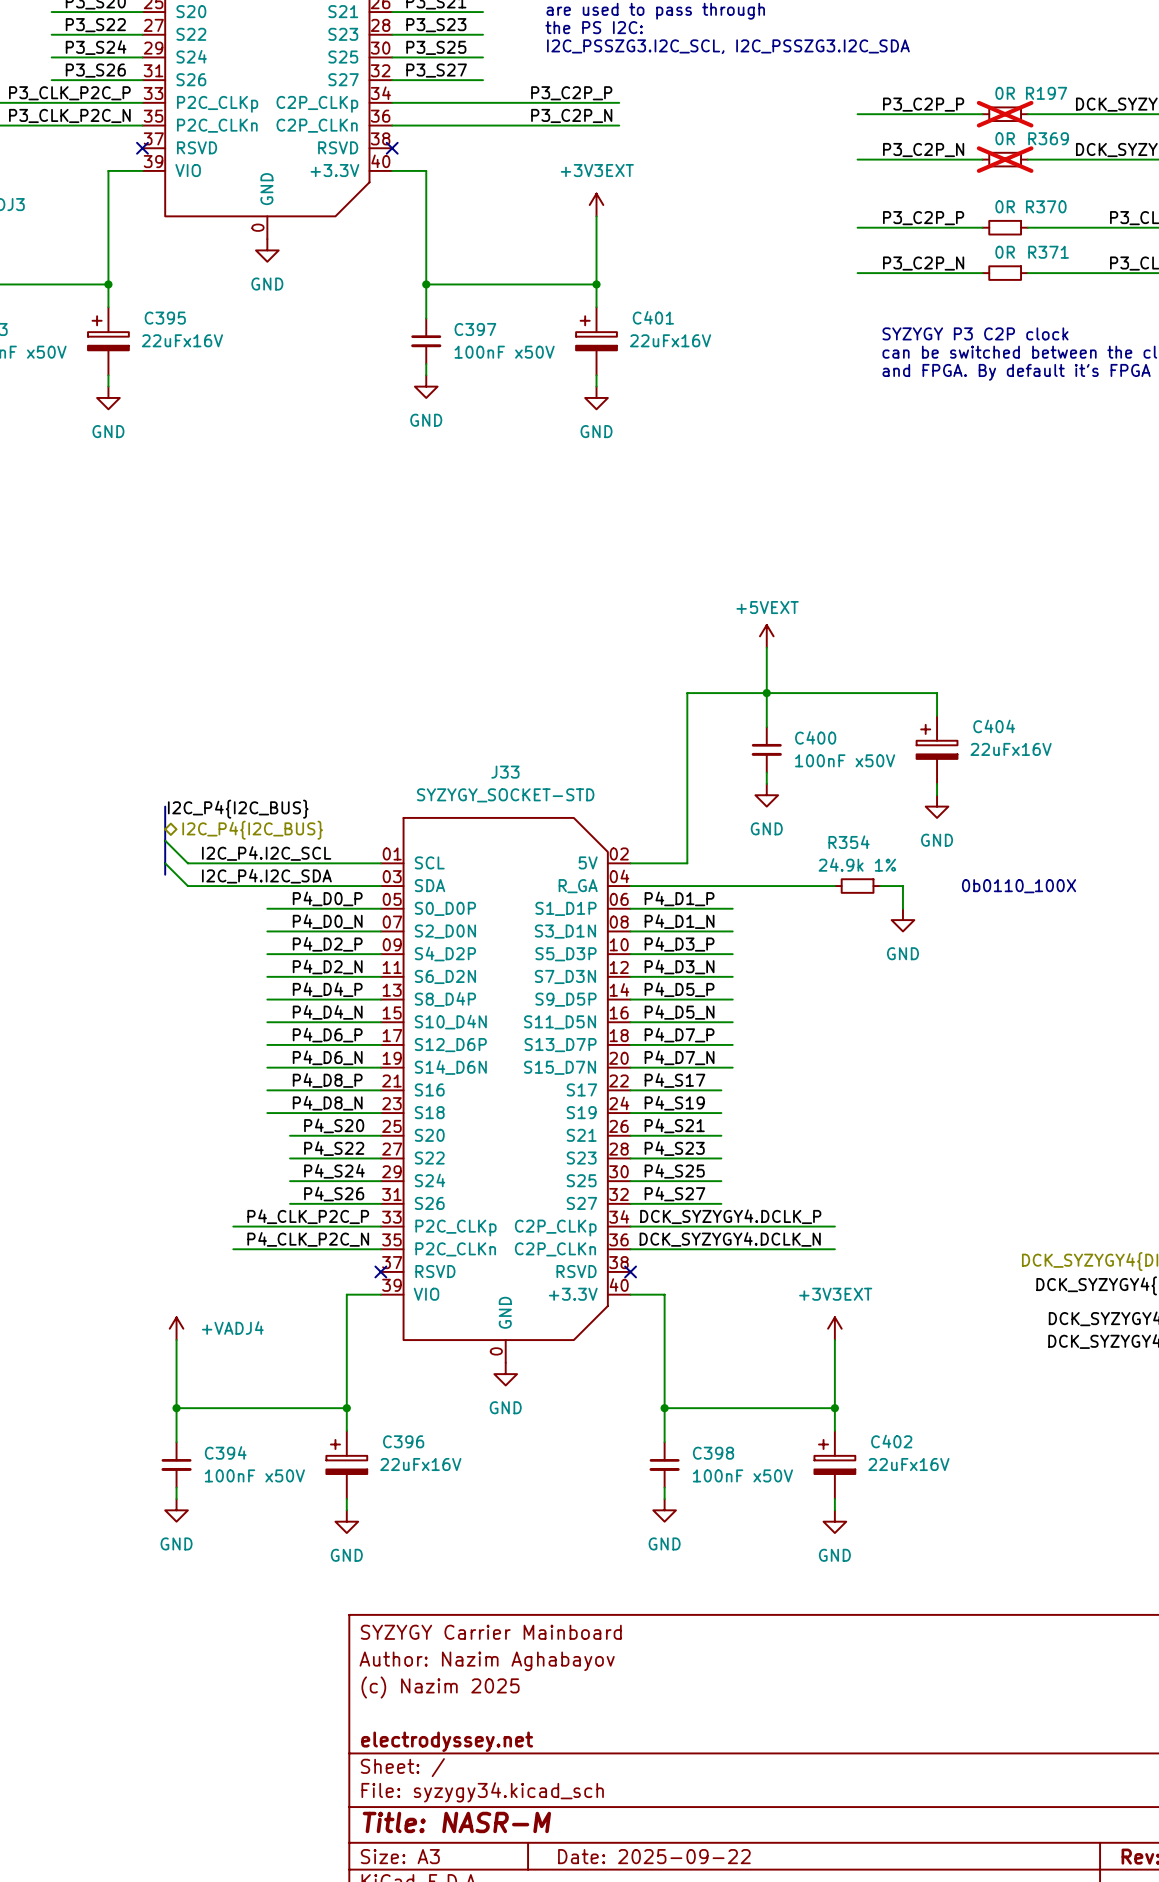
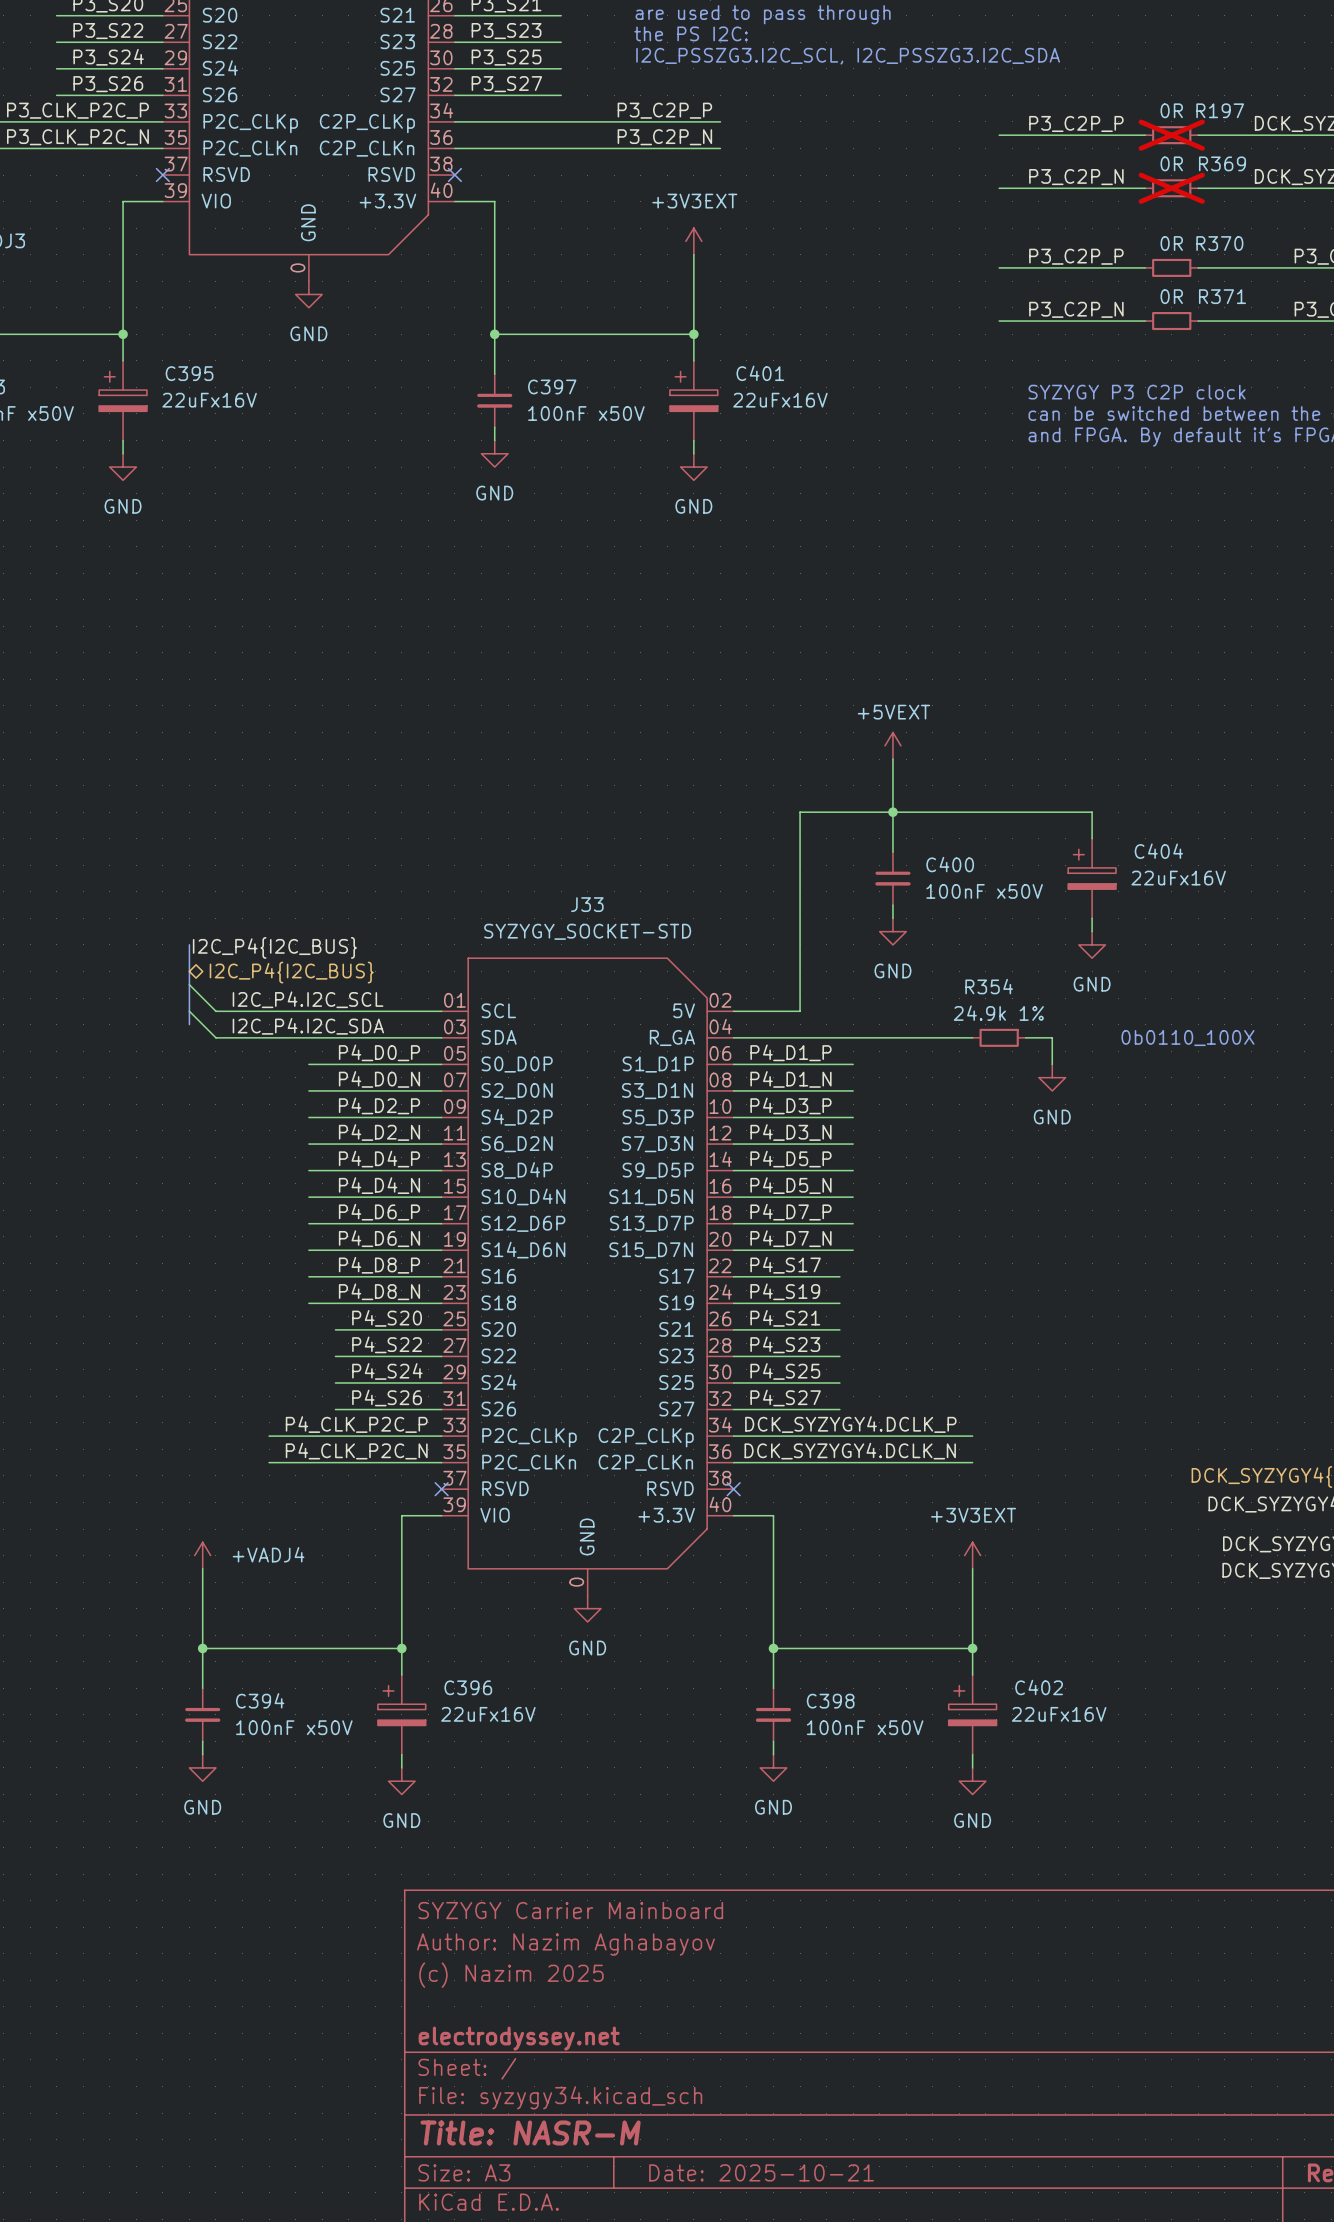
title block: Date: 2025-09-22 (654, 1856) -> Date: 2025-10-21 (761, 2172)

